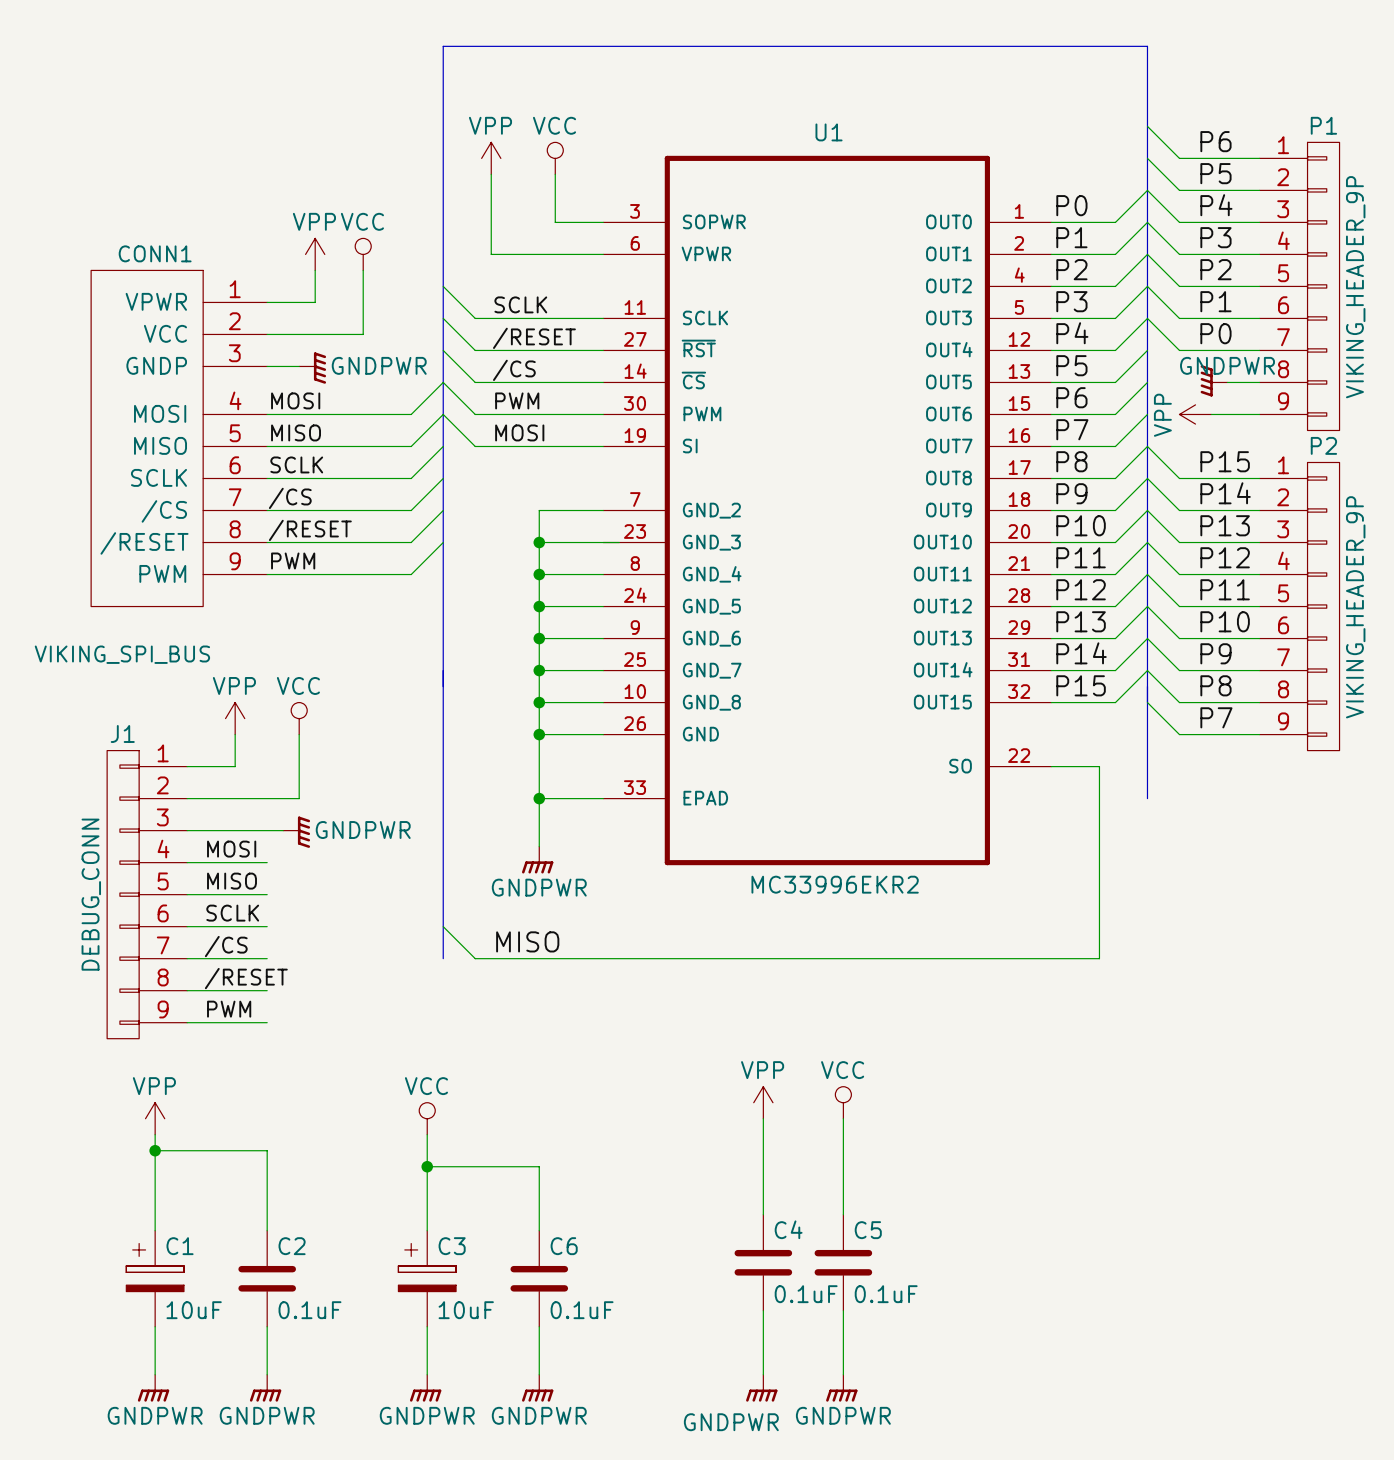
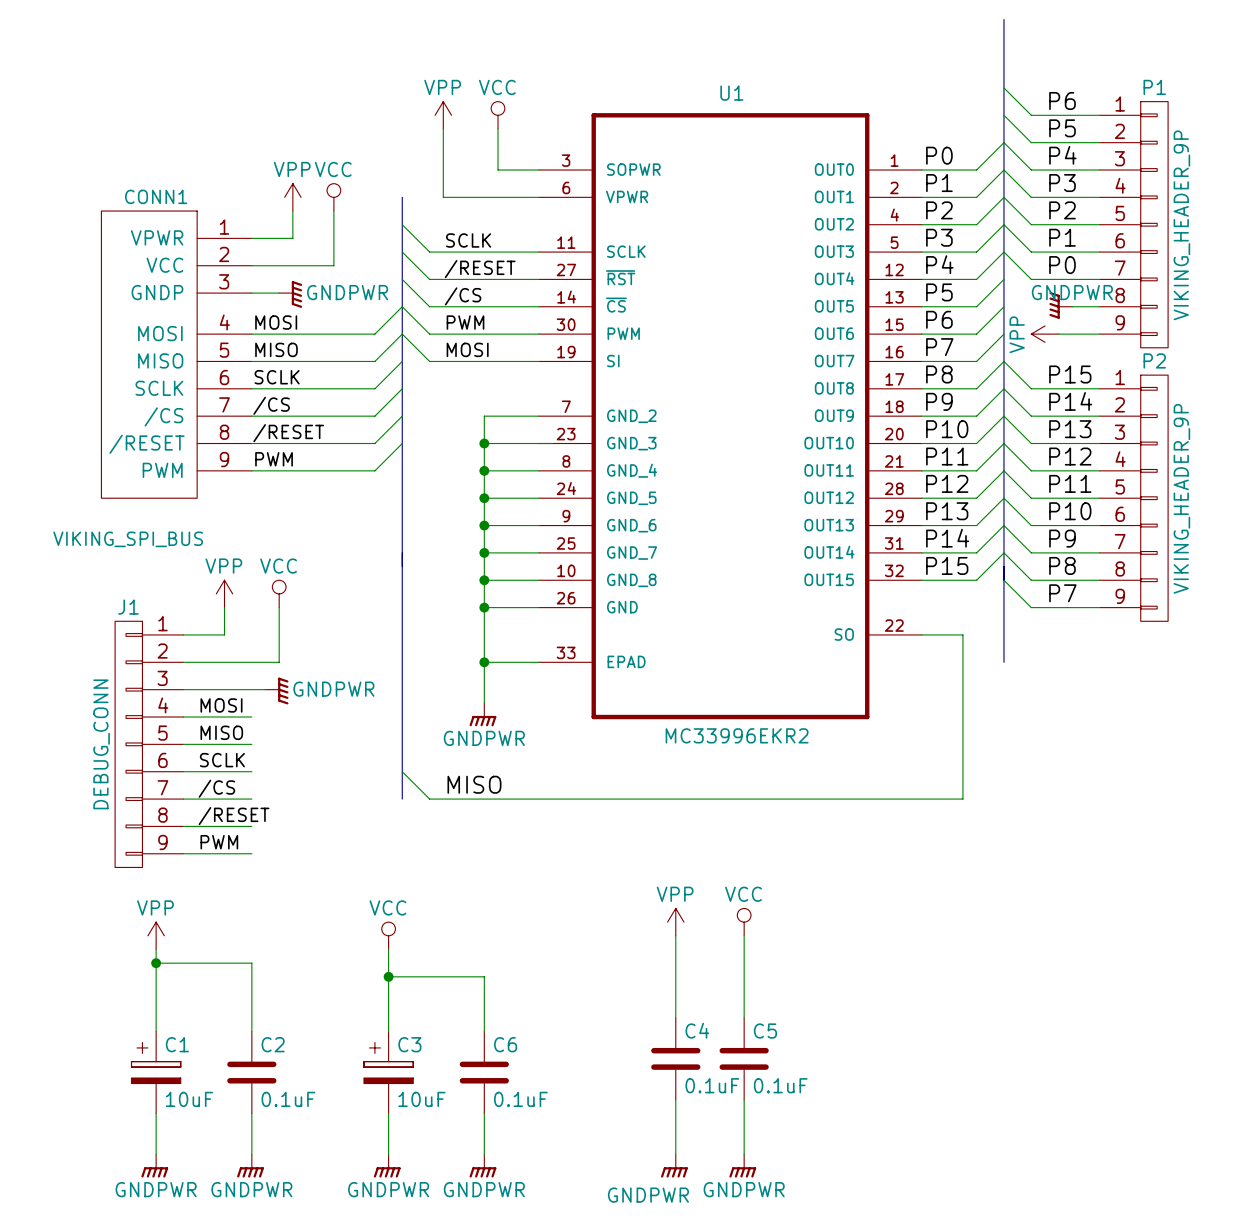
bus: (1147, 46) (443, 46) (443, 254) -> none

